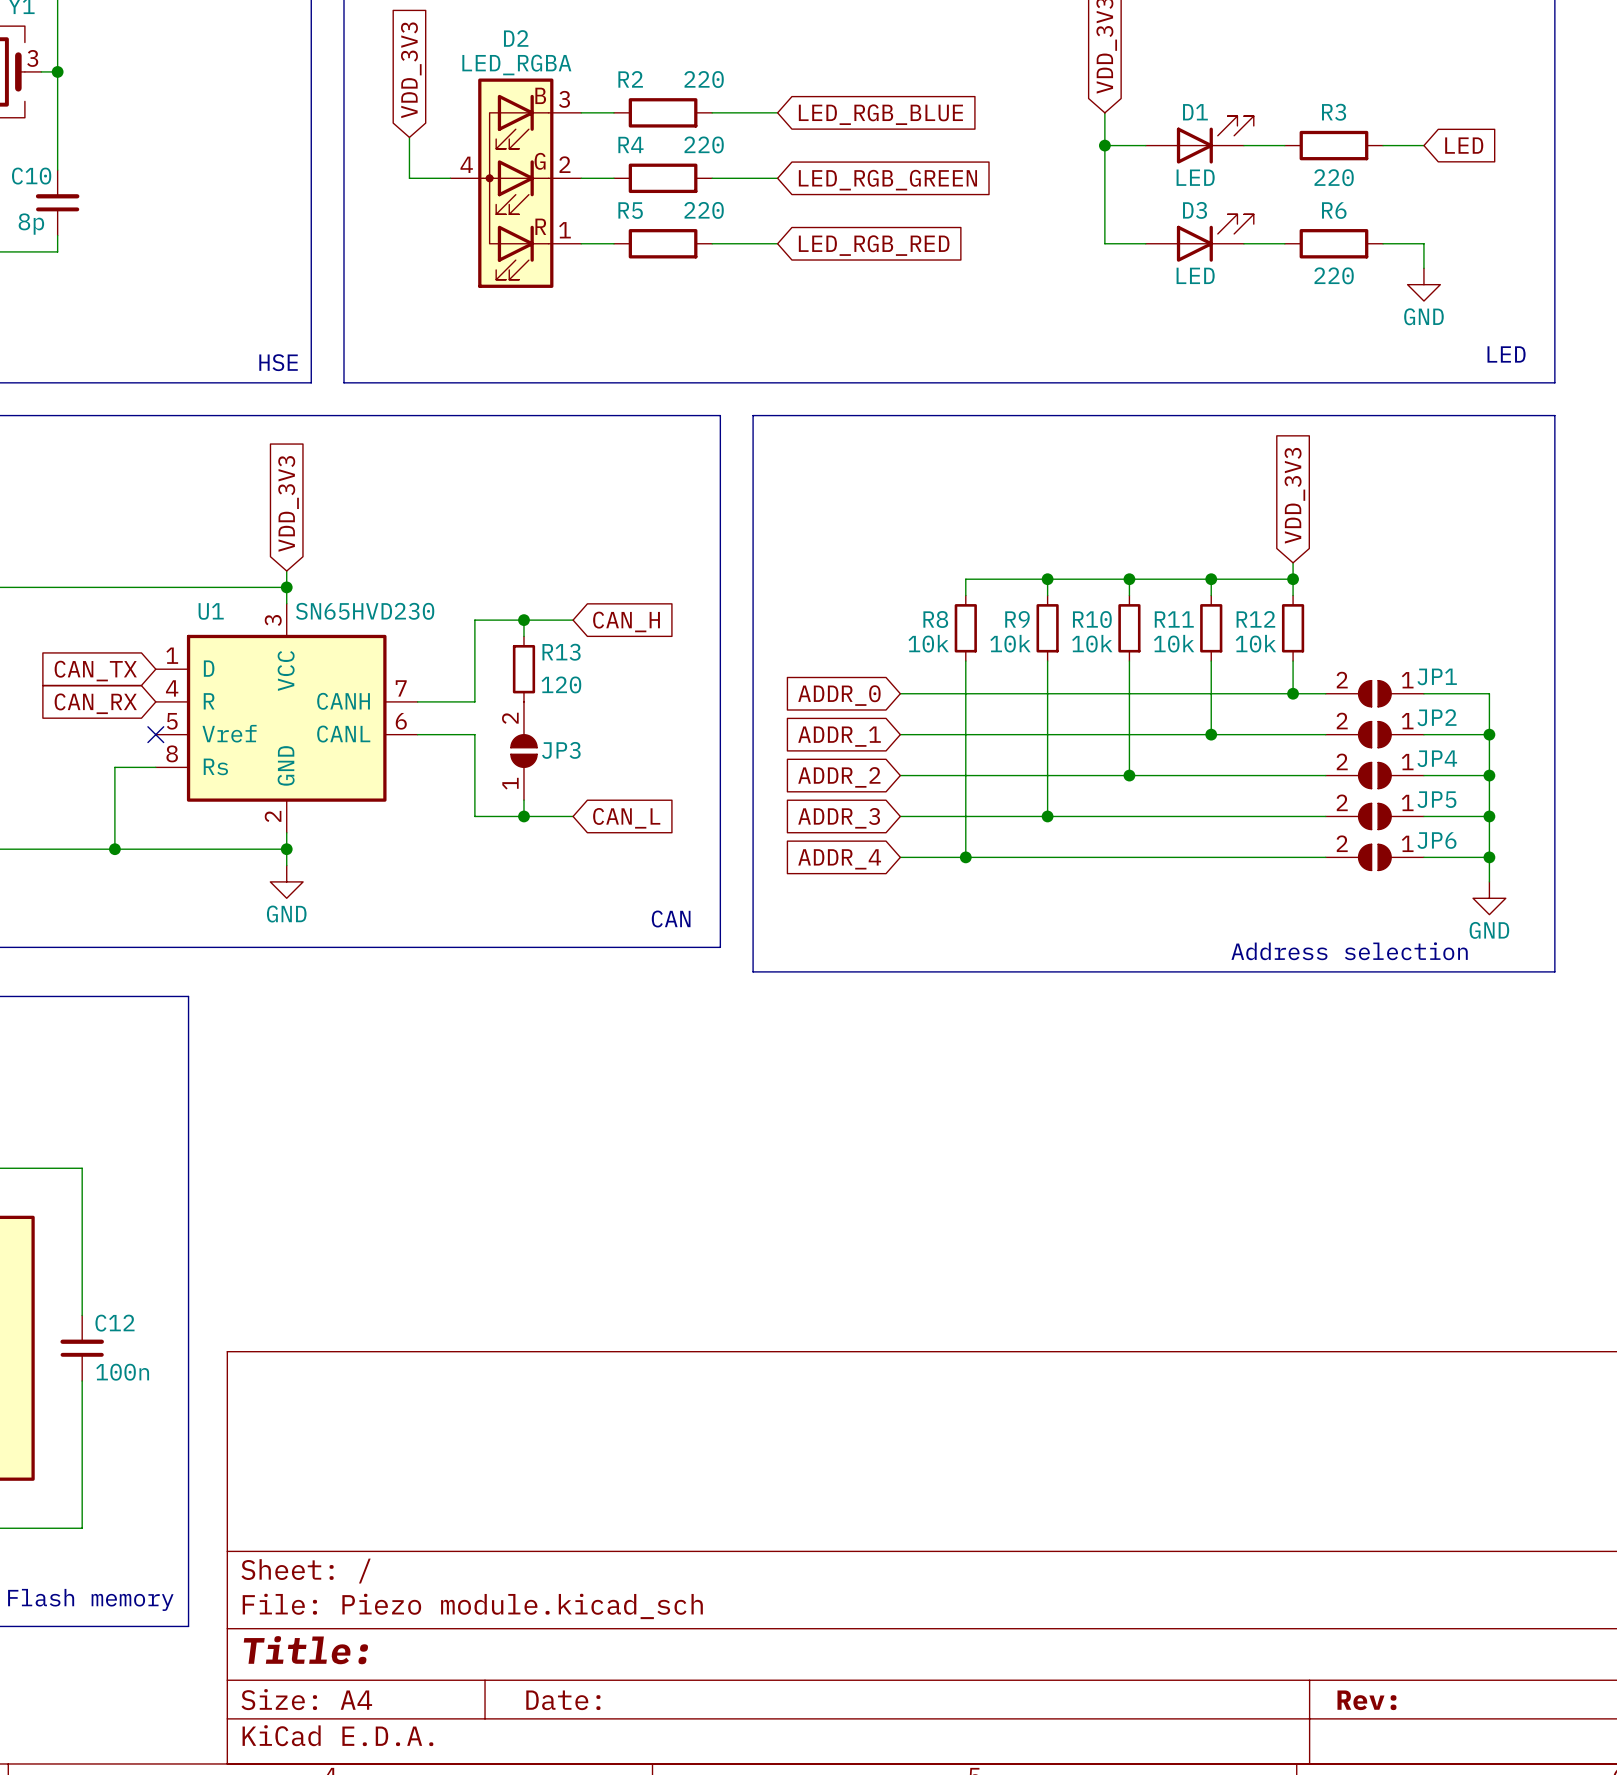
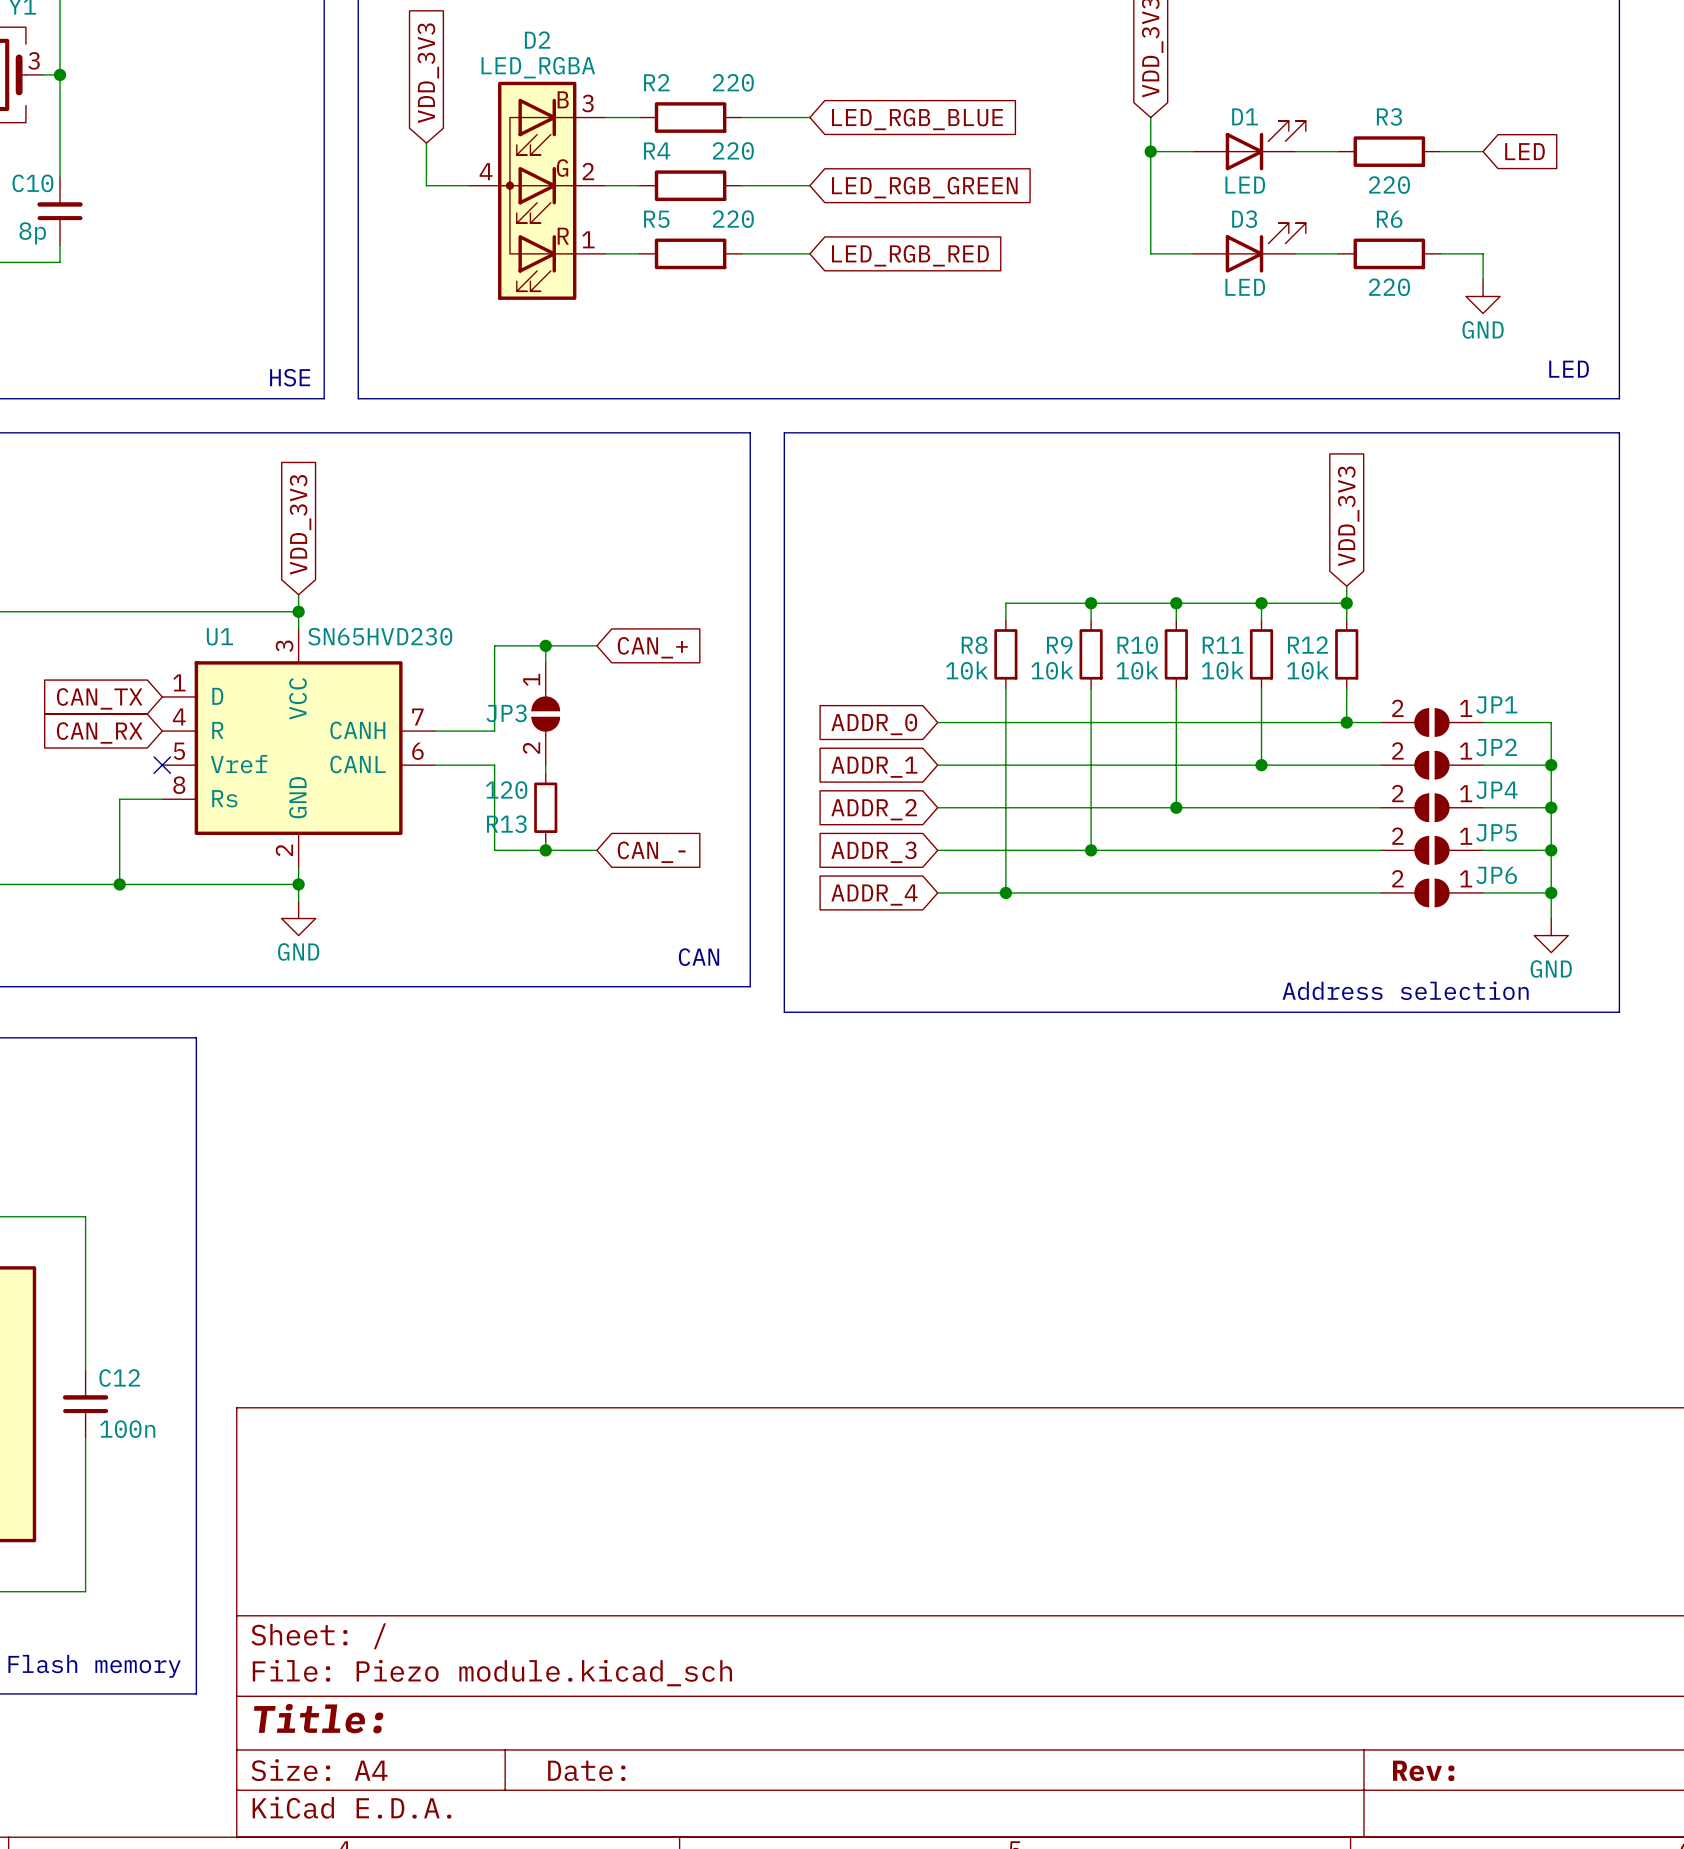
global label: CAN_H (626, 621) -> CAN_+ (652, 647)
R13 name position: R13 (561, 652) -> R13 (506, 824)
R13 position: (523, 669) -> (545, 807)
R13 value position: 120 (561, 684) -> 120 (506, 790)
JP3 rotation: 0° (523, 751) -> 180° (545, 714)
JP3 position: (523, 751) -> (545, 714)
global label: CAN_L (626, 818) -> CAN_- (651, 852)

